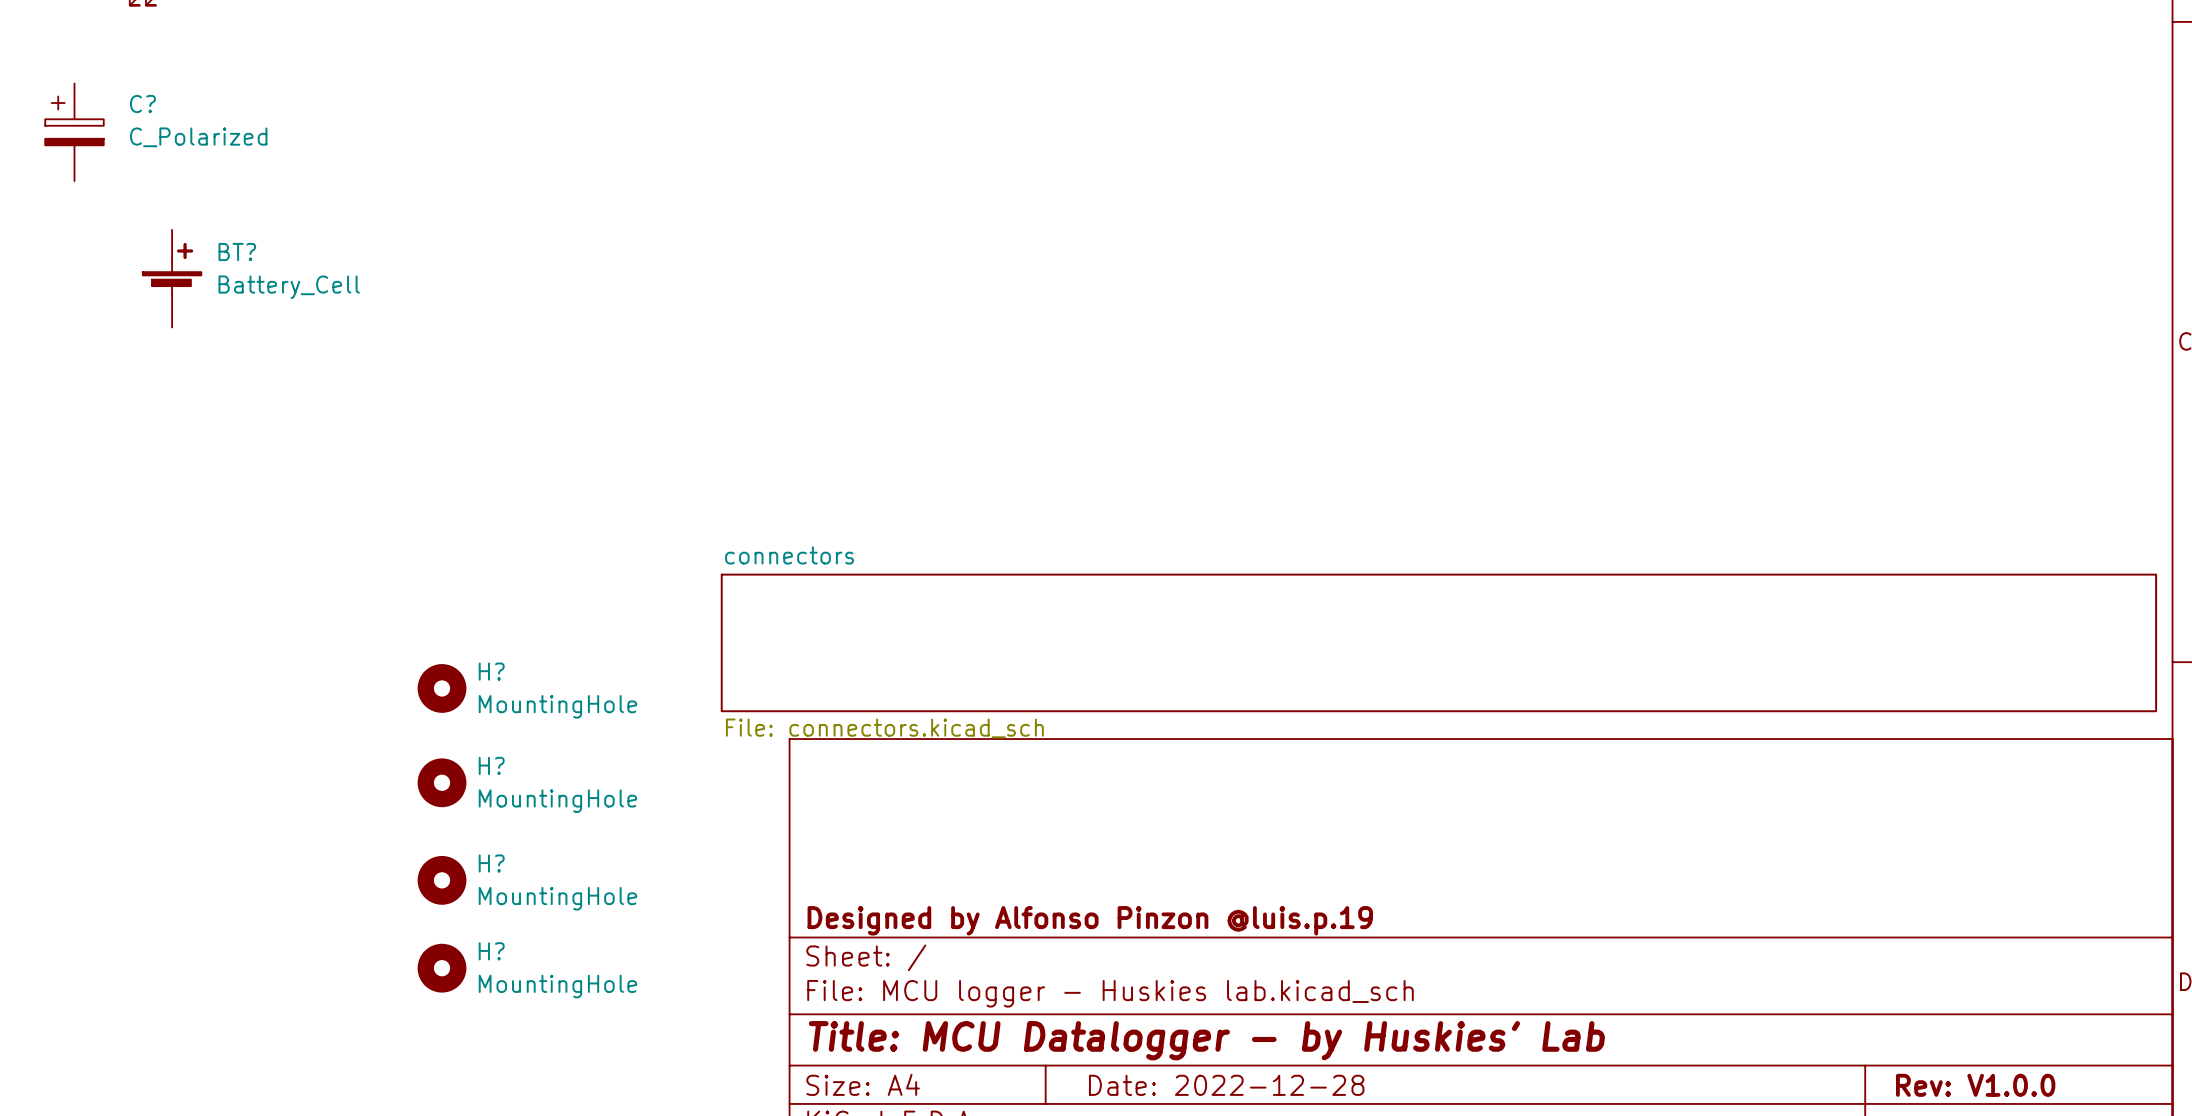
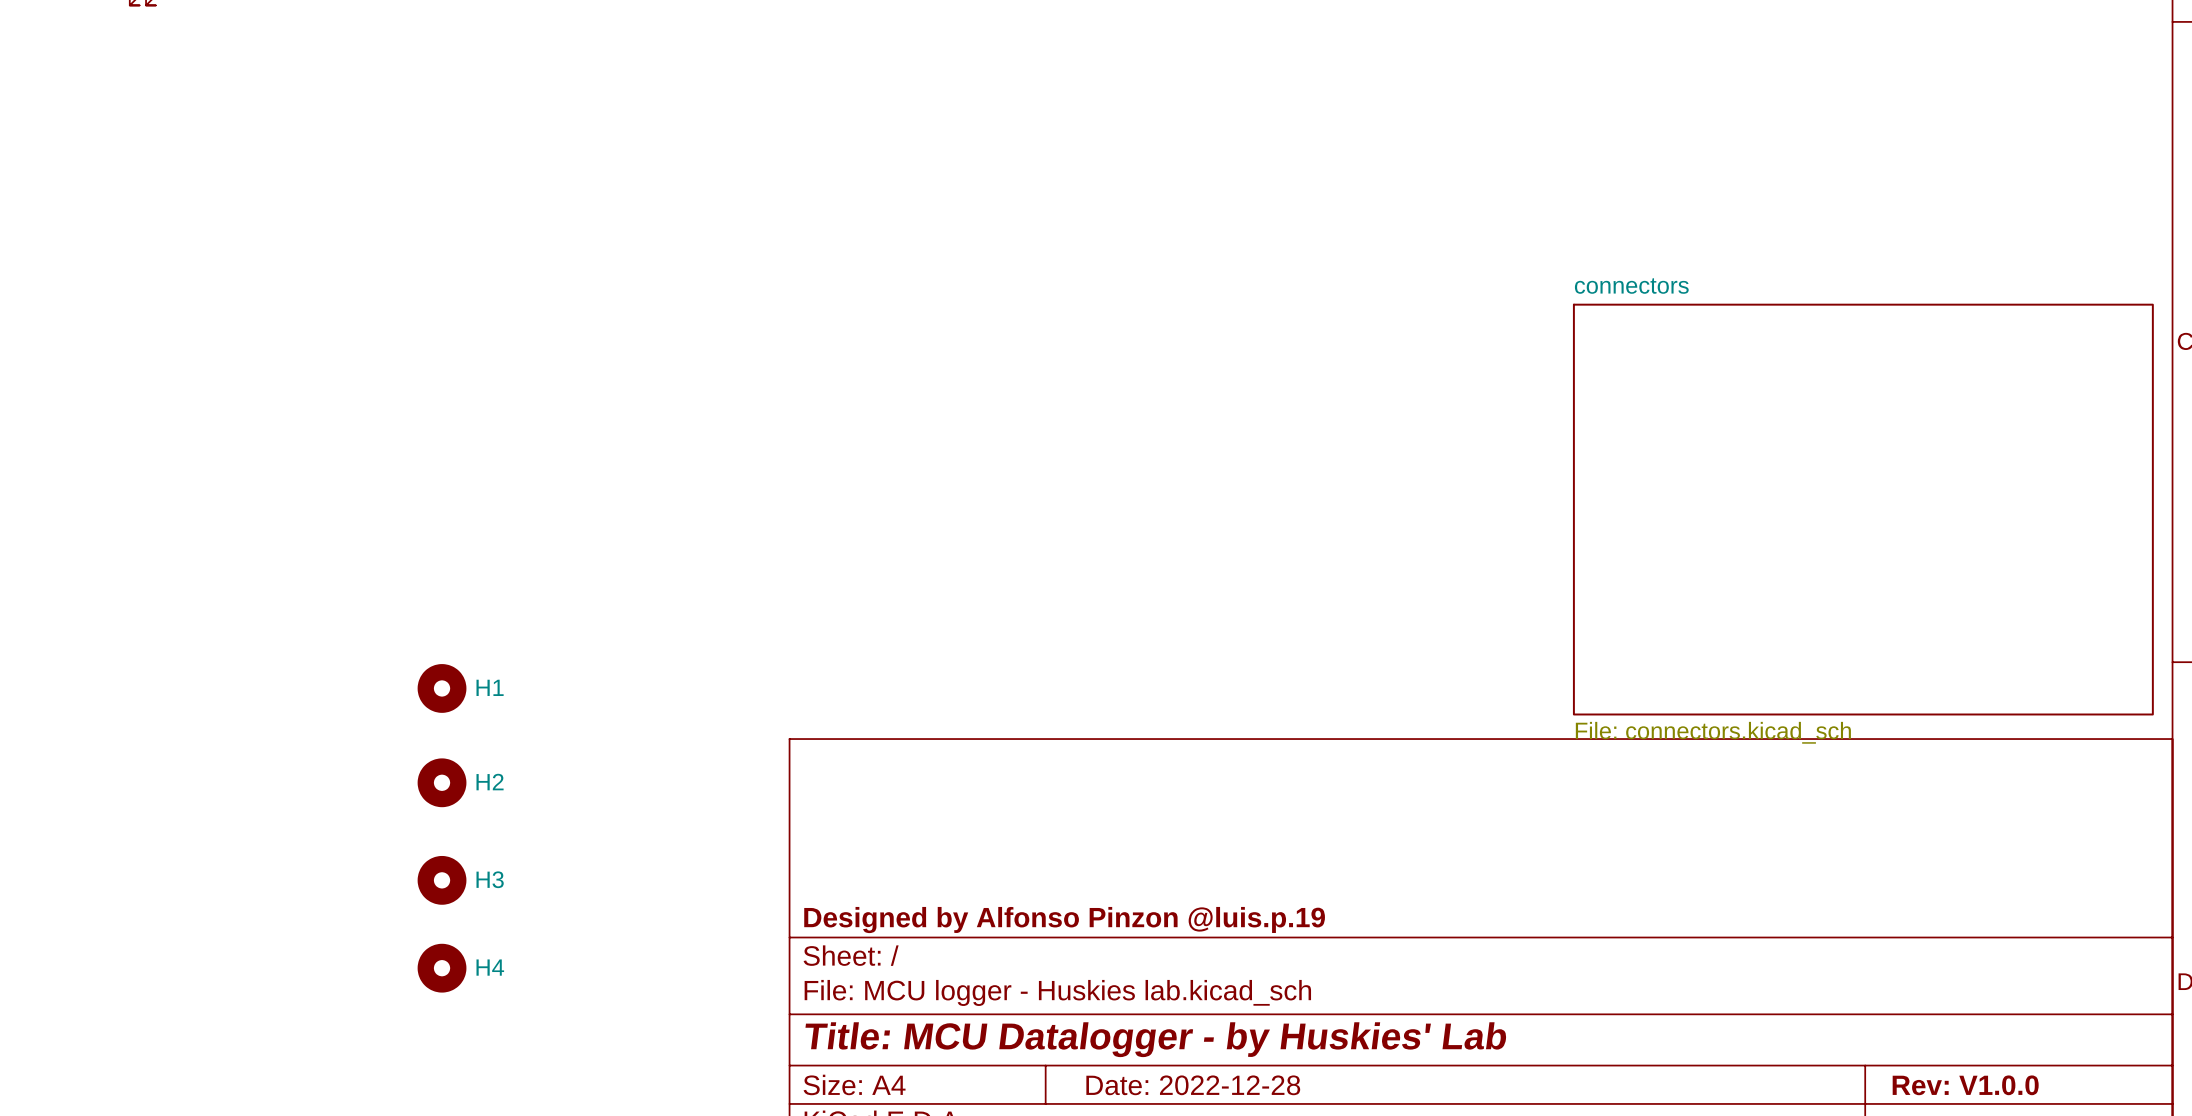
C?: C_Polarized (74, 132) -> none
BT?: Battery_Cell (172, 278) -> none
sheet connectors: none -> File: connectors.kicad_sch (1863, 509)
sheet connectors: File: connectors.kicad_sch (1438, 642) -> none
H? name: H? (491, 671) -> H1 (490, 687)
H? value: MountingHole (557, 706) -> none
H? name: H? (491, 765) -> H2 (490, 782)
H? value: MountingHole (557, 801) -> none
H? name: H? (491, 863) -> H3 (490, 879)
H? value: MountingHole (557, 898) -> none
H? name: H? (491, 951) -> H4 (490, 967)
H? value: MountingHole (557, 986) -> none

